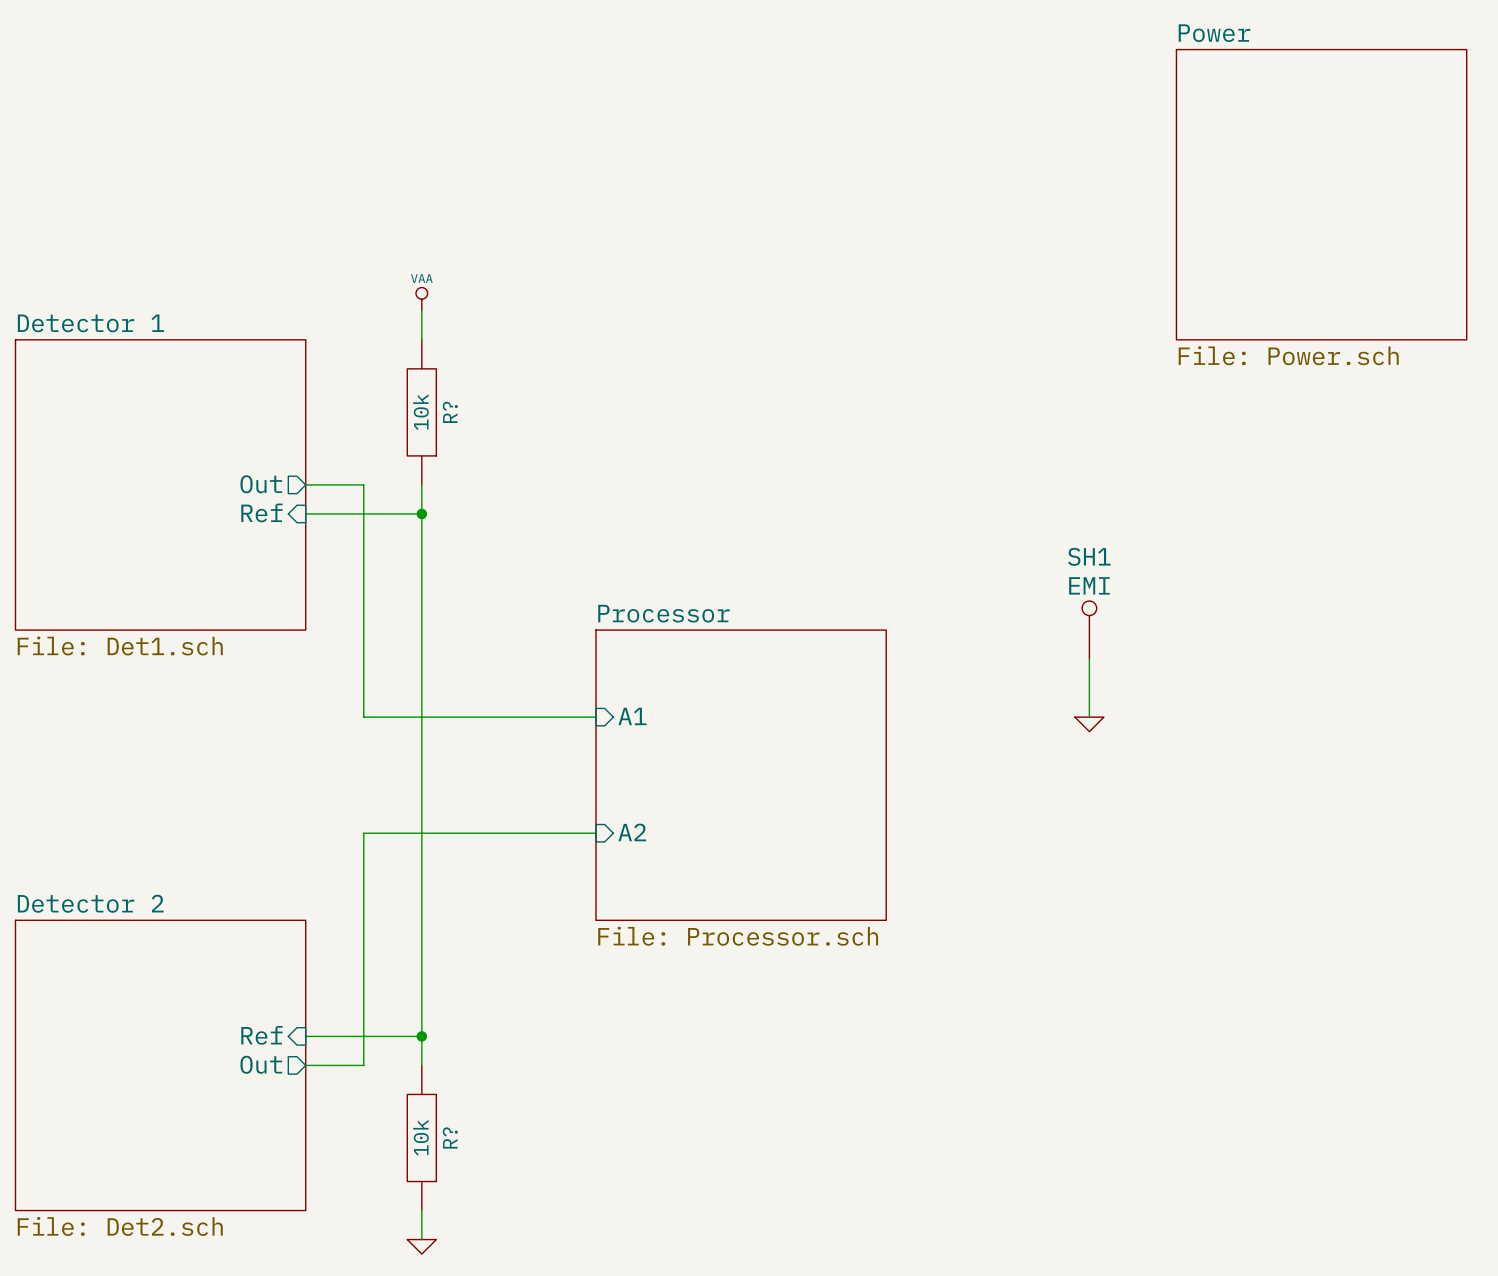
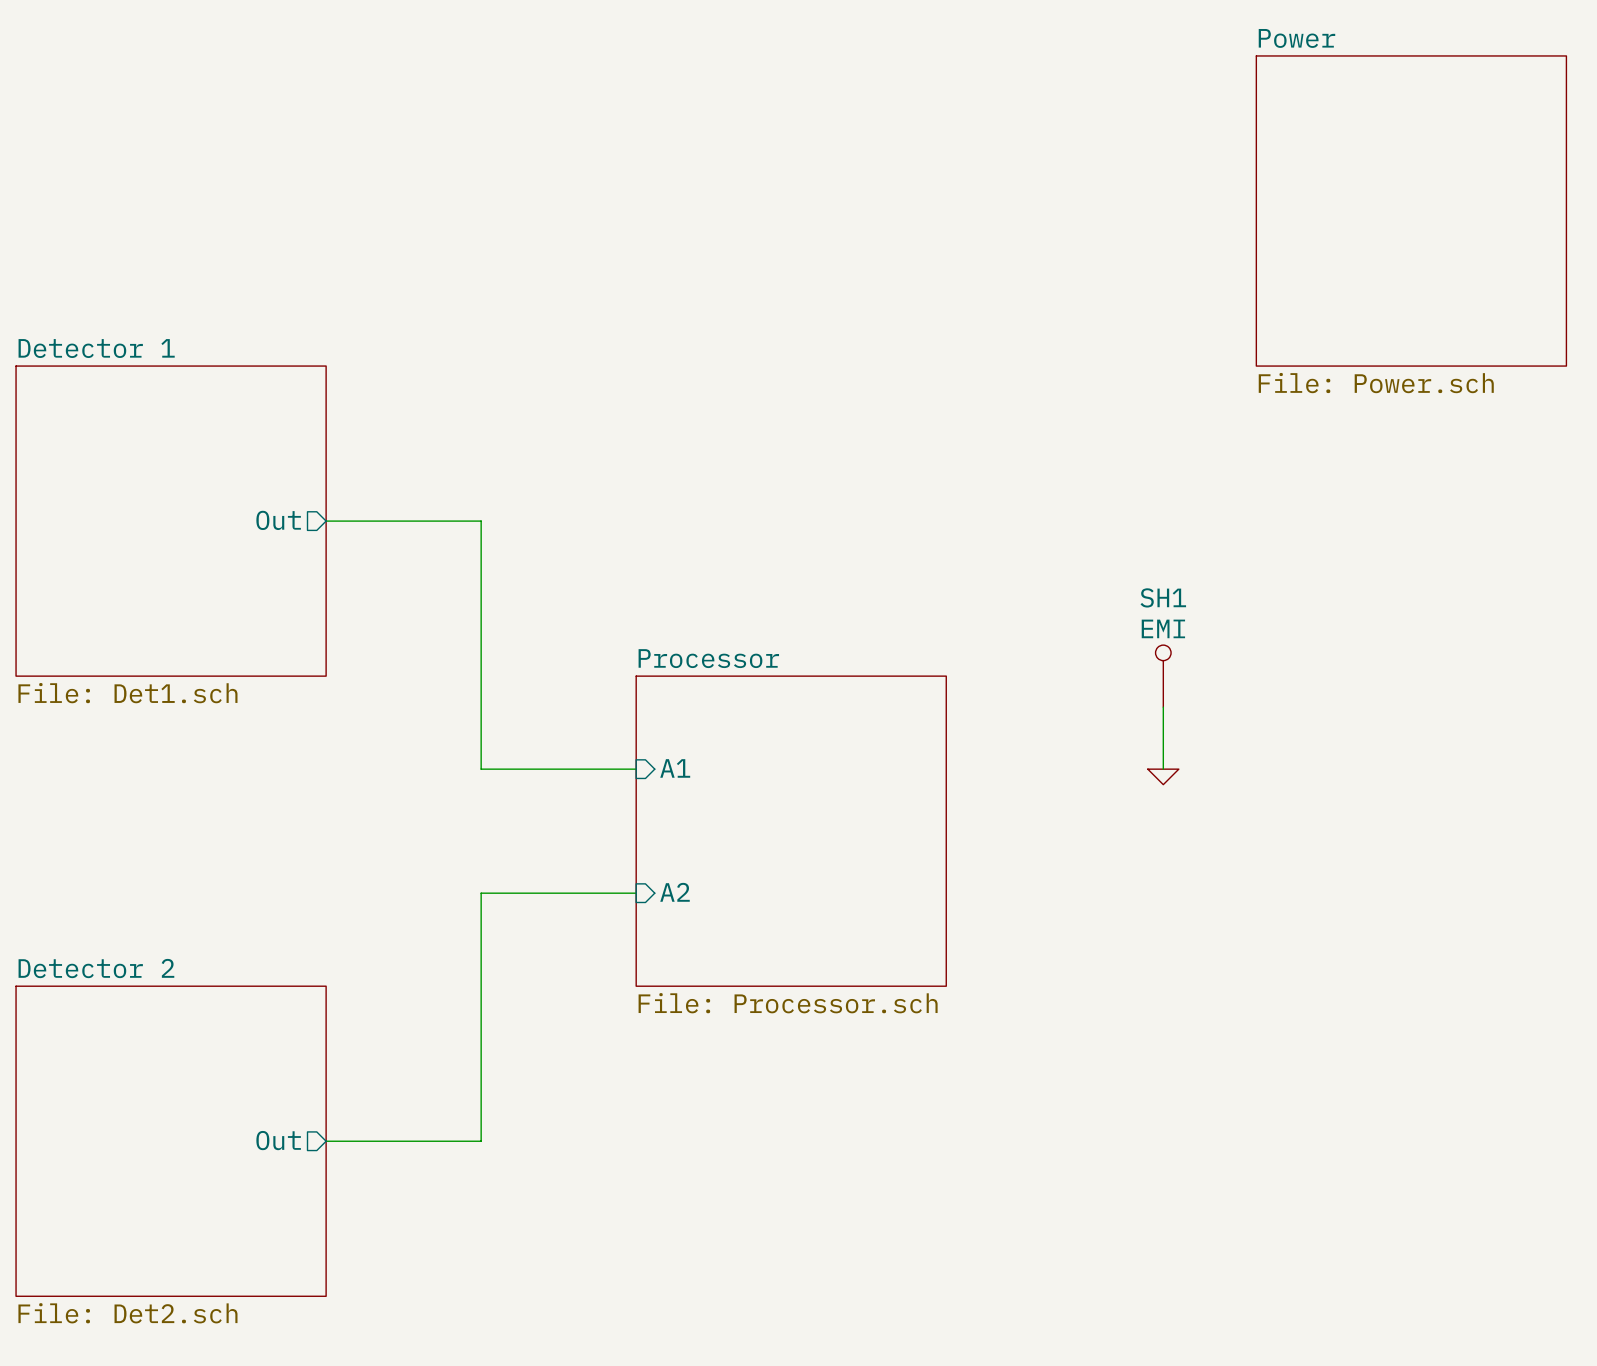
power symbol: VAA (421, 299) -> none
wire: (421, 310) (421, 339) -> none
R?: 10k (421, 412) -> none
wire: (363, 484) (363, 717) (450, 717) -> (388, 521) (481, 521) (481, 769)
wire: (421, 484) (421, 1065) -> none
sheet pin: Ref (261, 512) -> none
wire: (305, 513) (421, 513) -> none
junction: (421, 513) -> none
wire: (450, 833) (363, 833) (363, 1065) -> (481, 893) (481, 1141) (388, 1141)
sheet pin: Ref (261, 1035) -> none
wire: (305, 1036) (421, 1036) -> none
junction: (421, 1036) -> none
R?: 10k (421, 1137) -> none
wire: (421, 1210) (421, 1239) -> none
power symbol: (421, 1246) -> none

